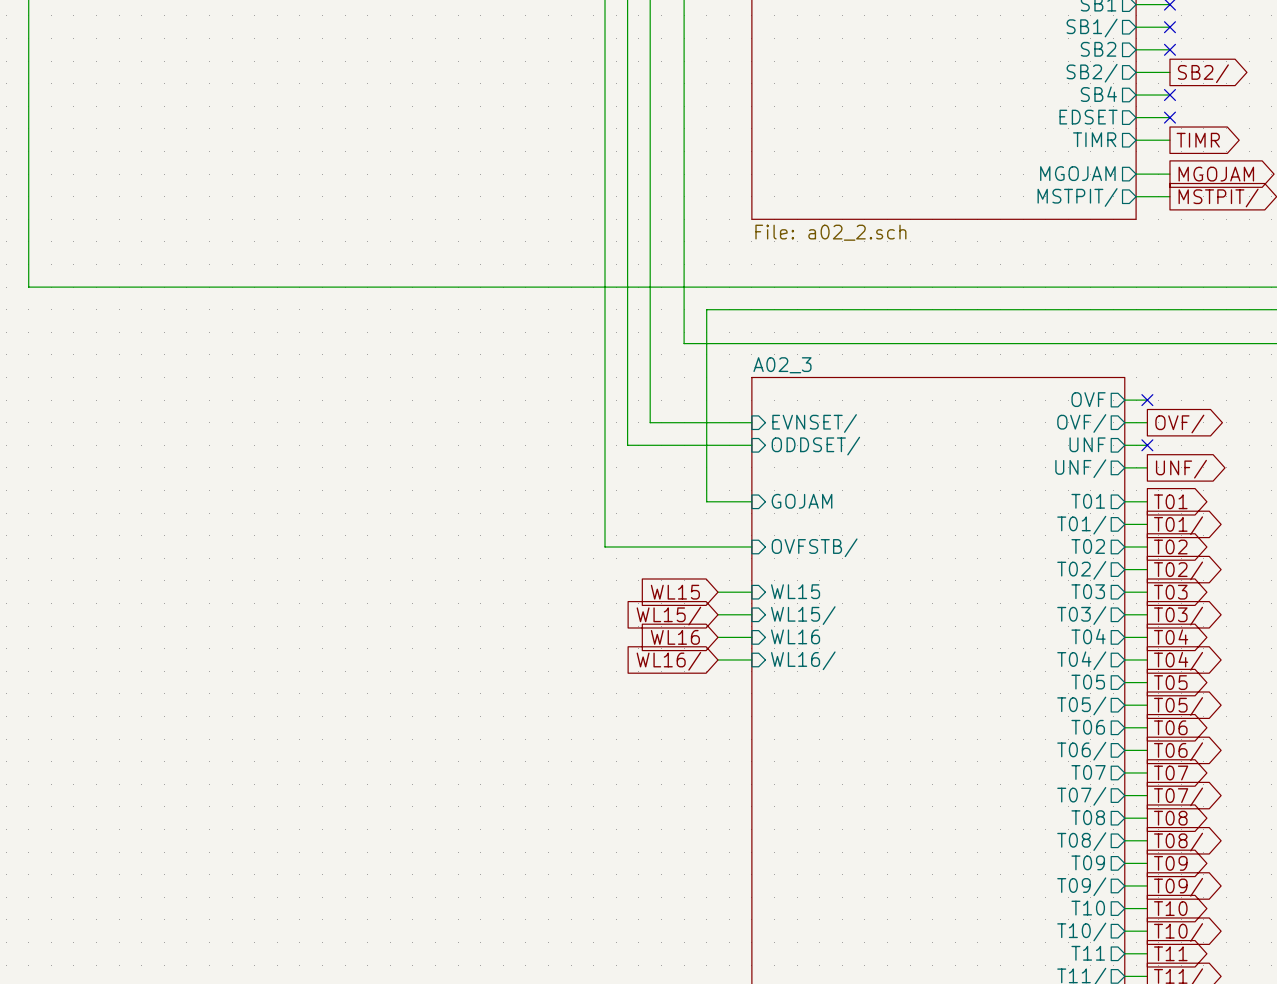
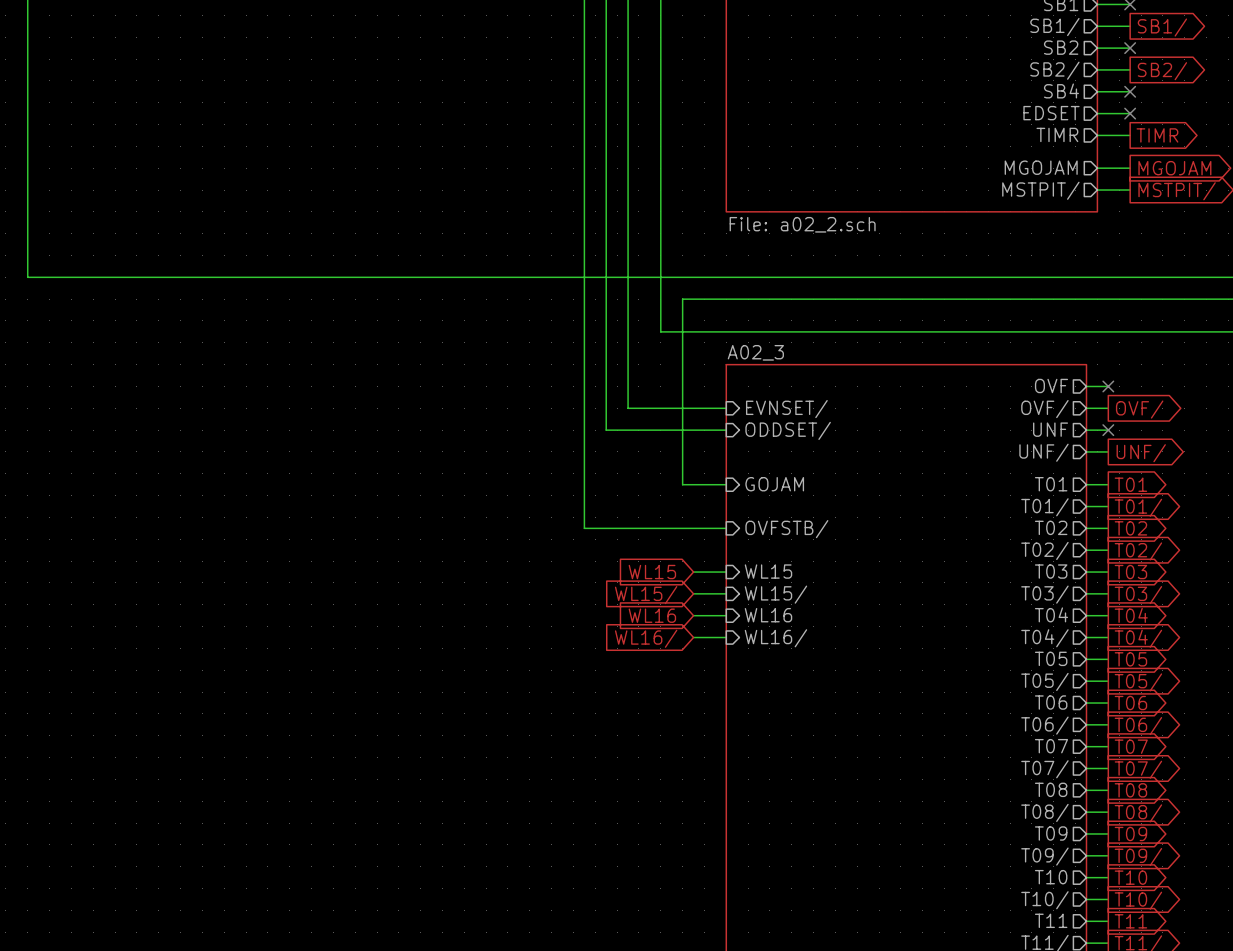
no-connect mark: (1169, 27) -> none
global label: none -> SB1/ (1162, 27)

